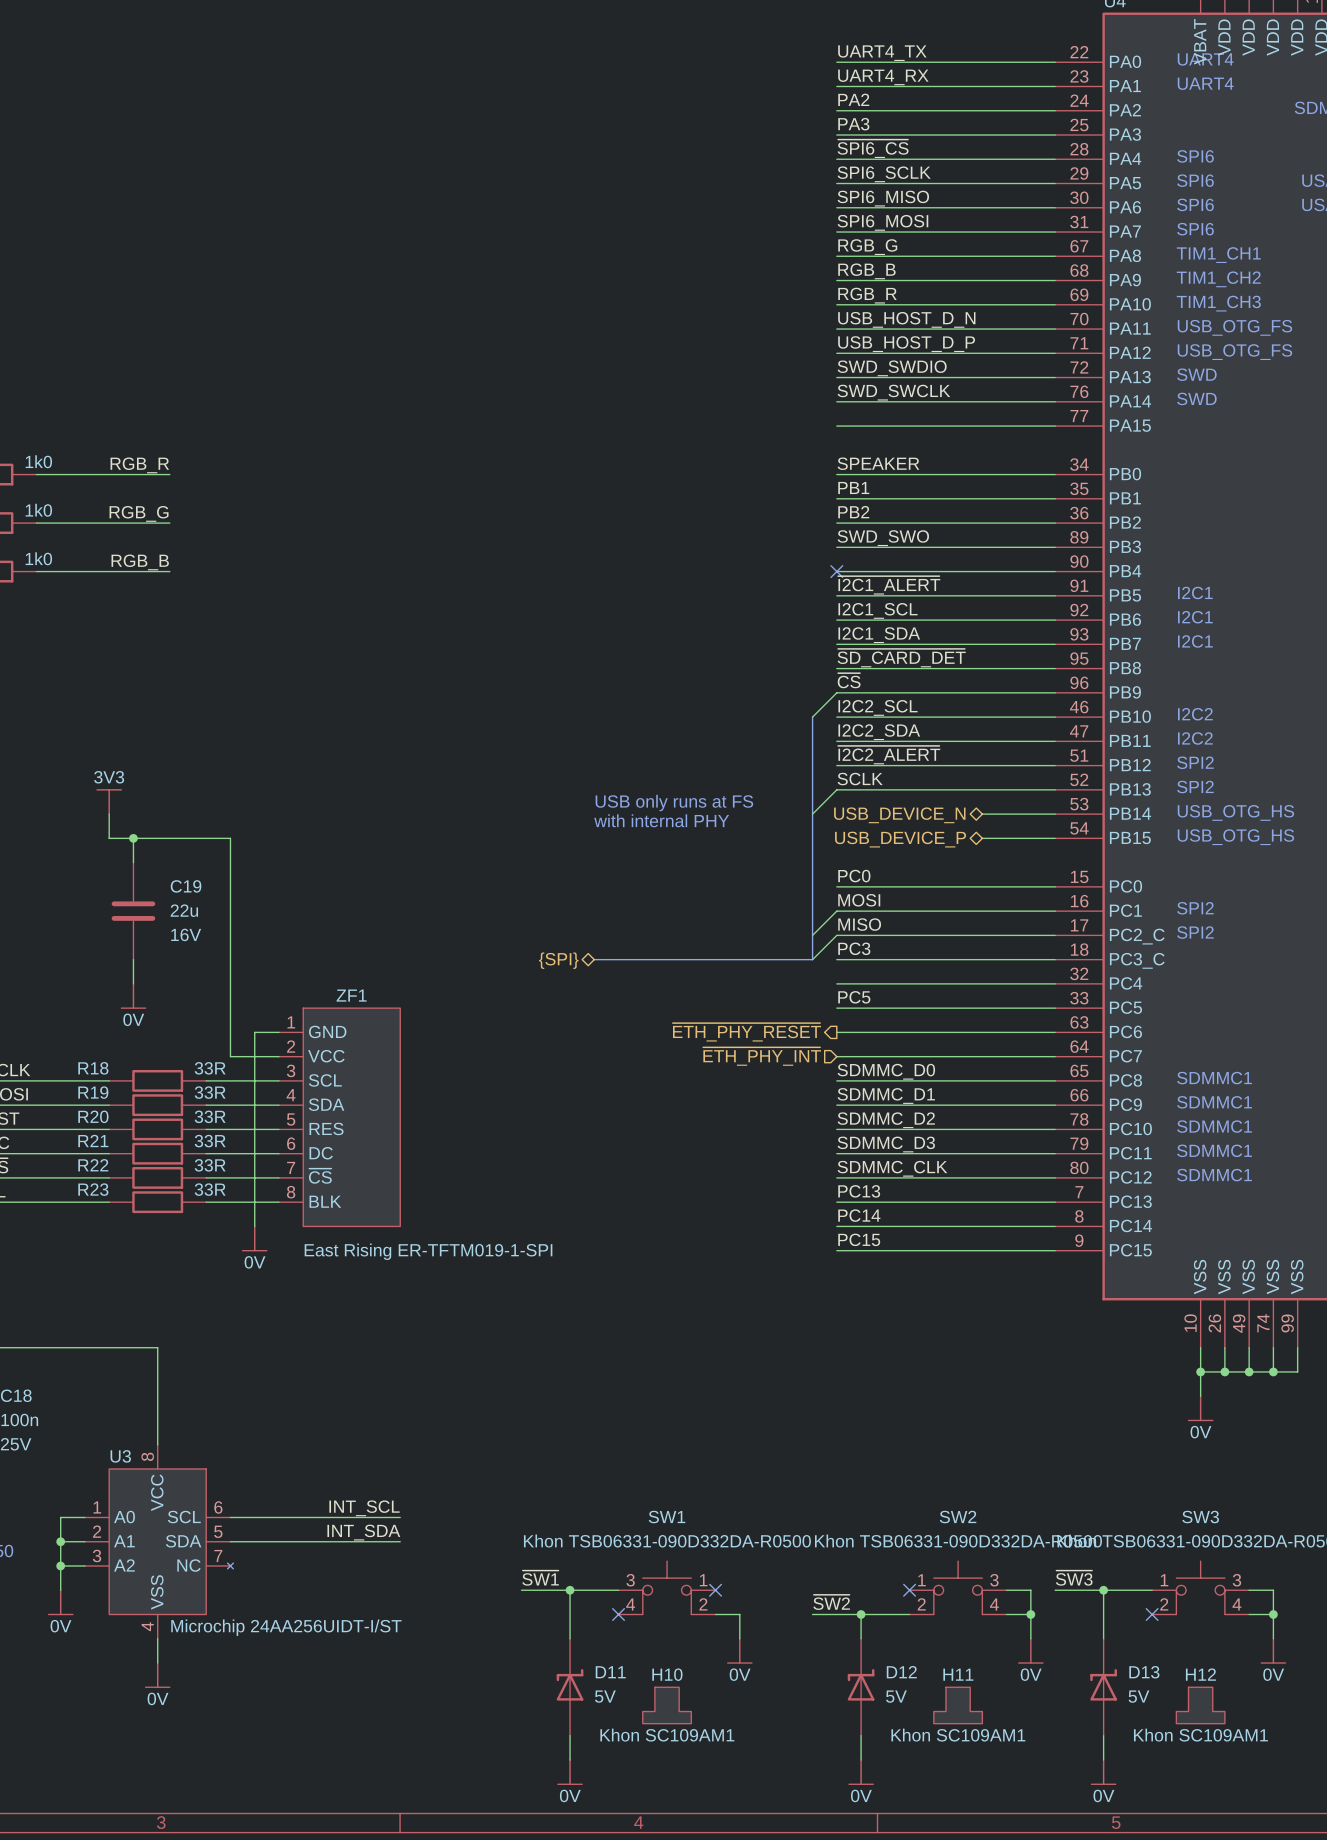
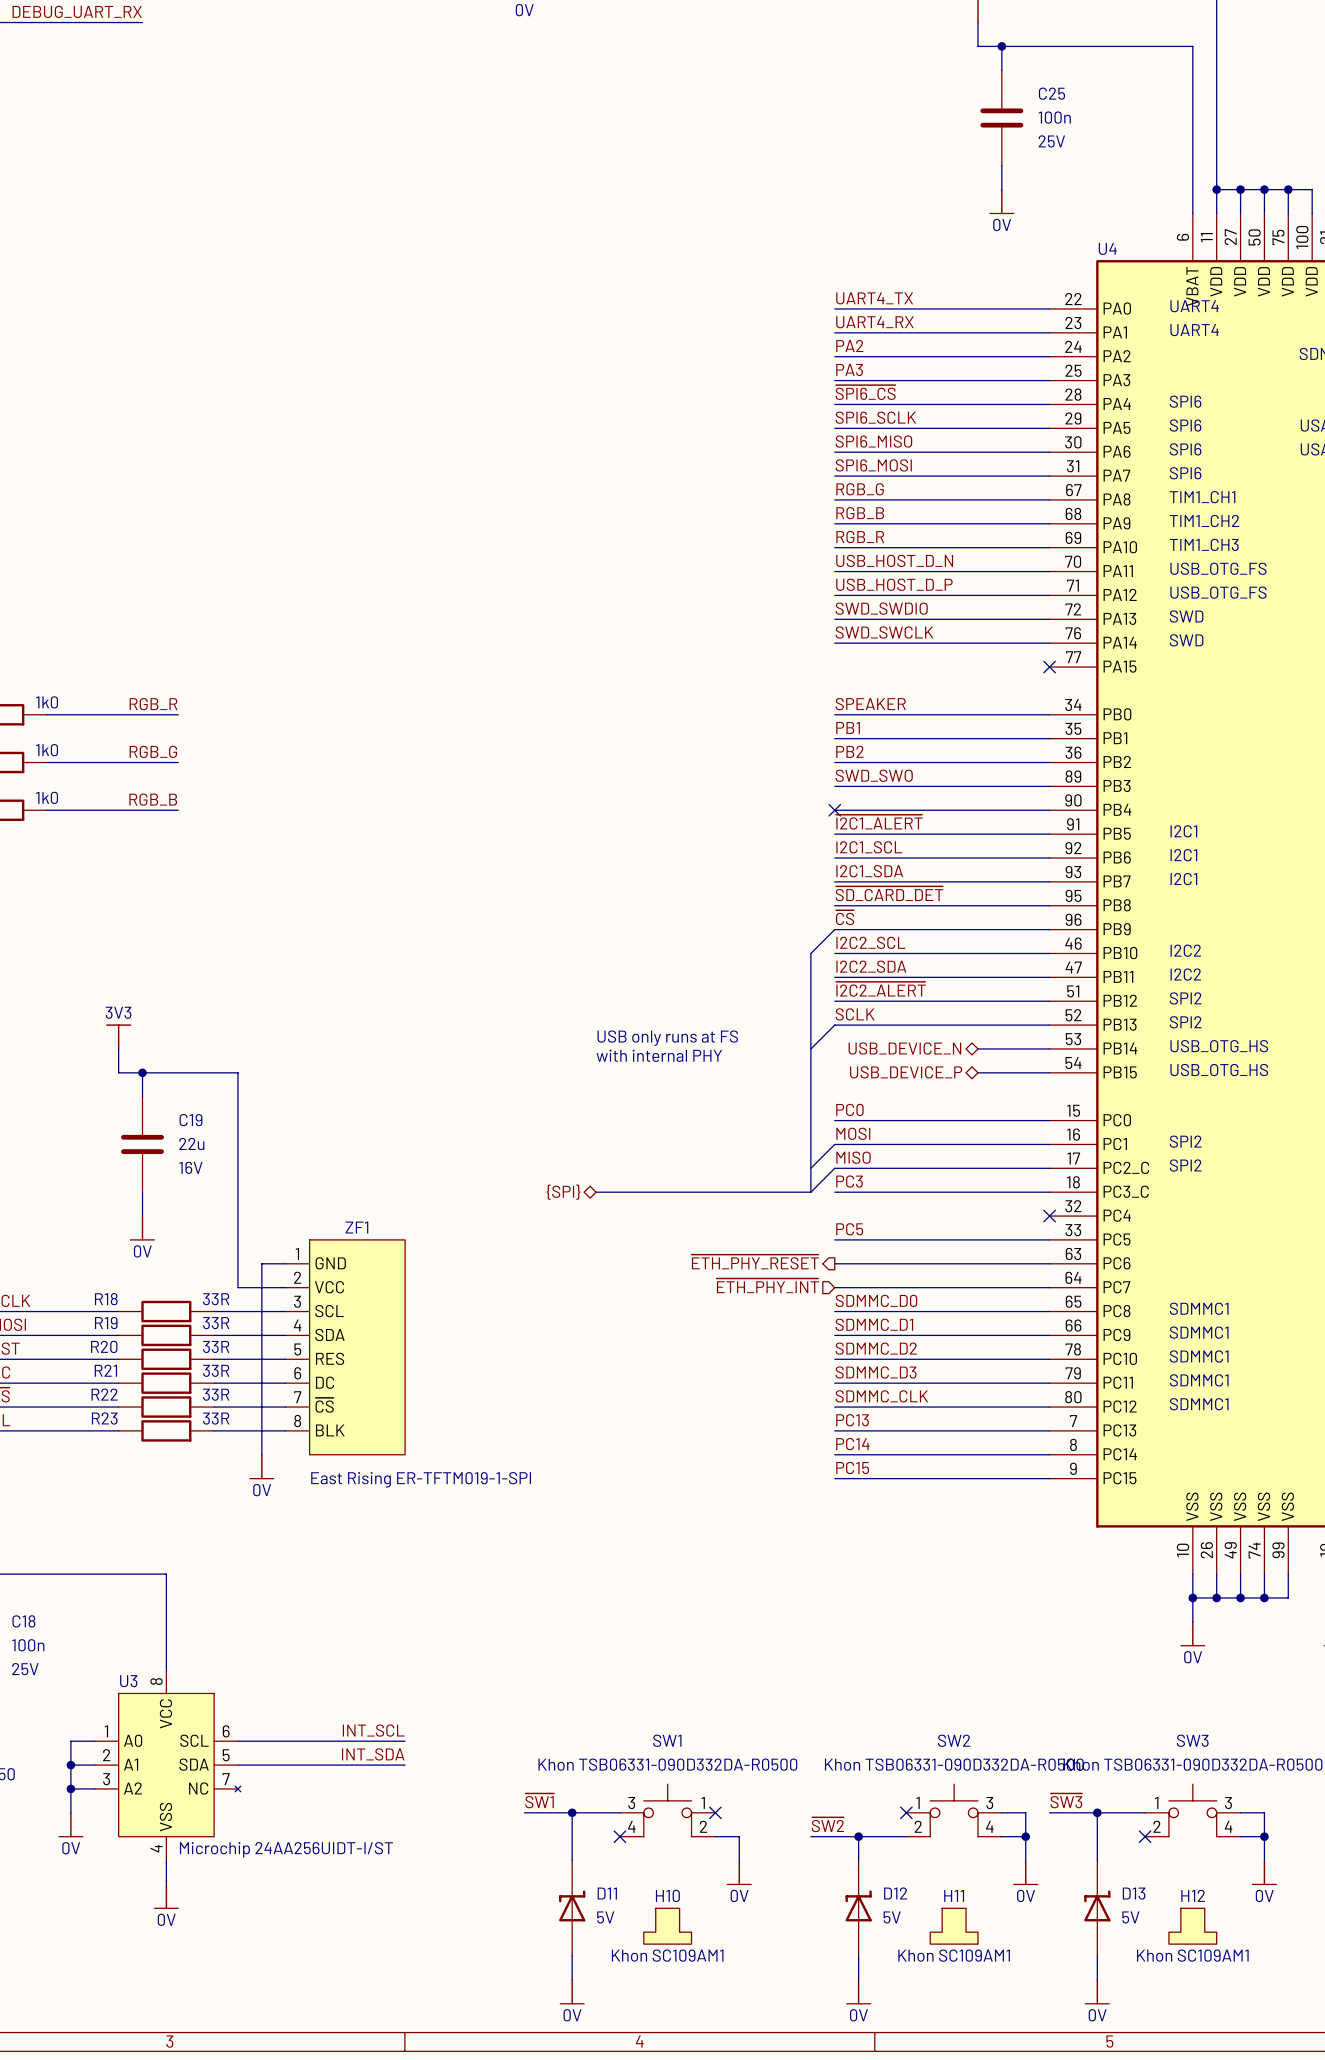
wire: (836, 426) (1055, 426) -> none
no-connect mark: none -> (1049, 667)
wire: (836, 983) (1055, 983) -> none
no-connect mark: none -> (1049, 1216)

